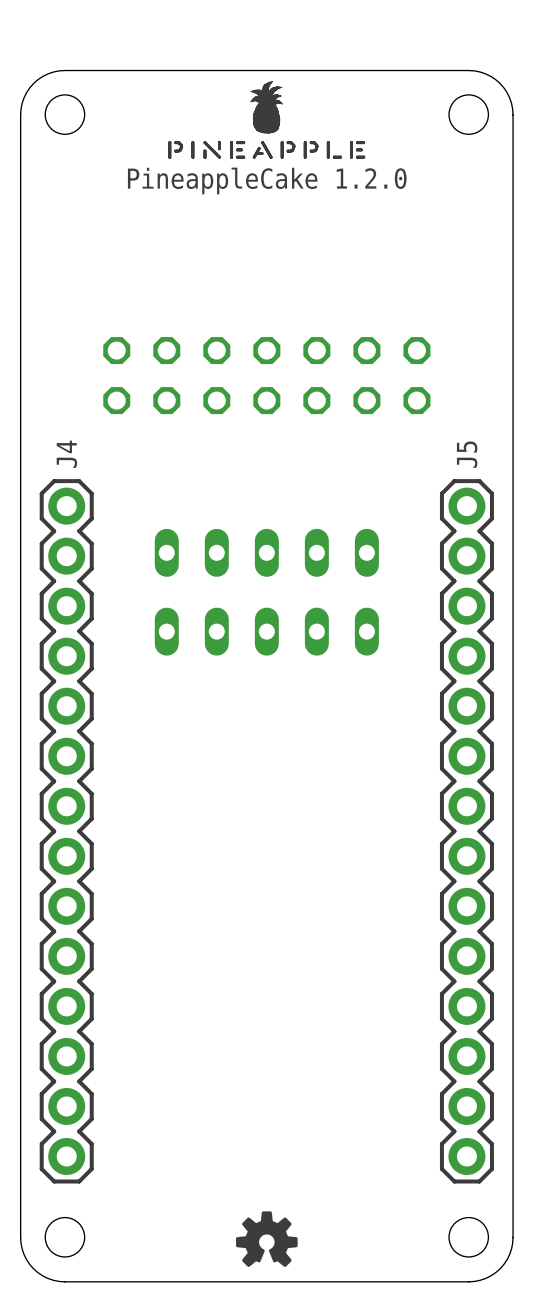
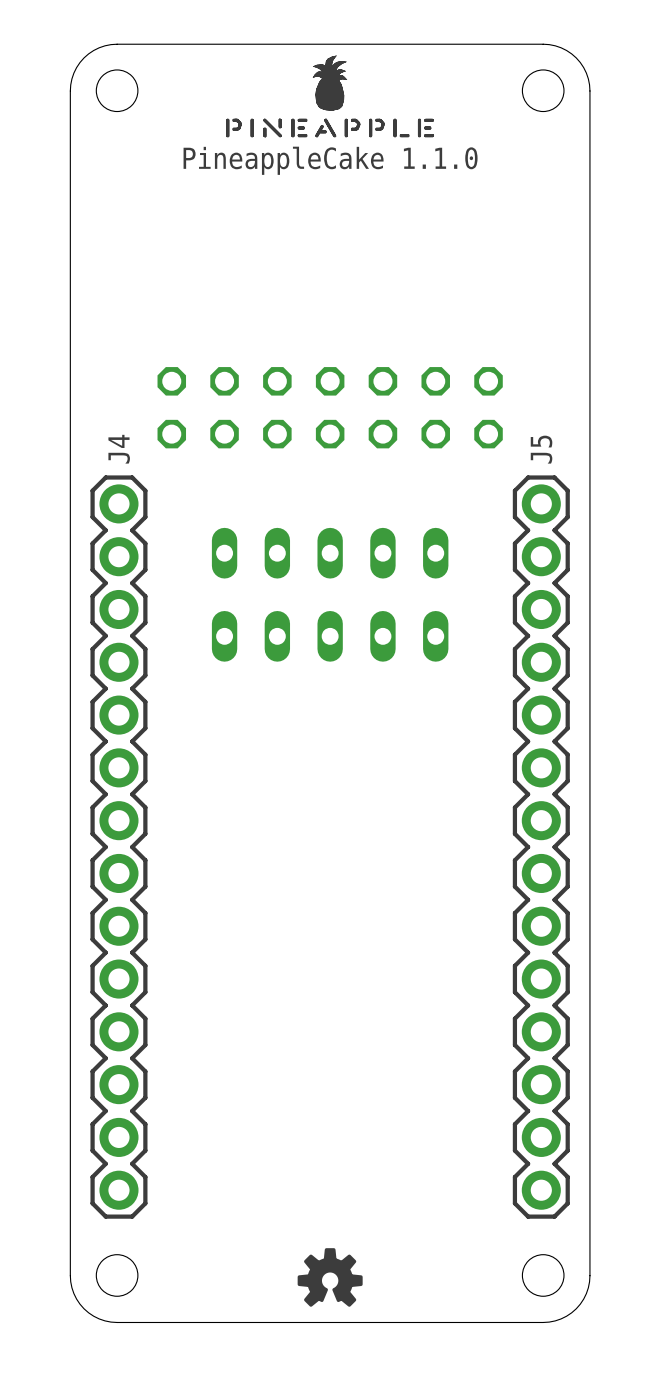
text: PineappleCake 1.2.0 (267, 180) -> PineappleCake 1.1.0 (330, 160)
part position: (266, 375) -> (330, 407)

